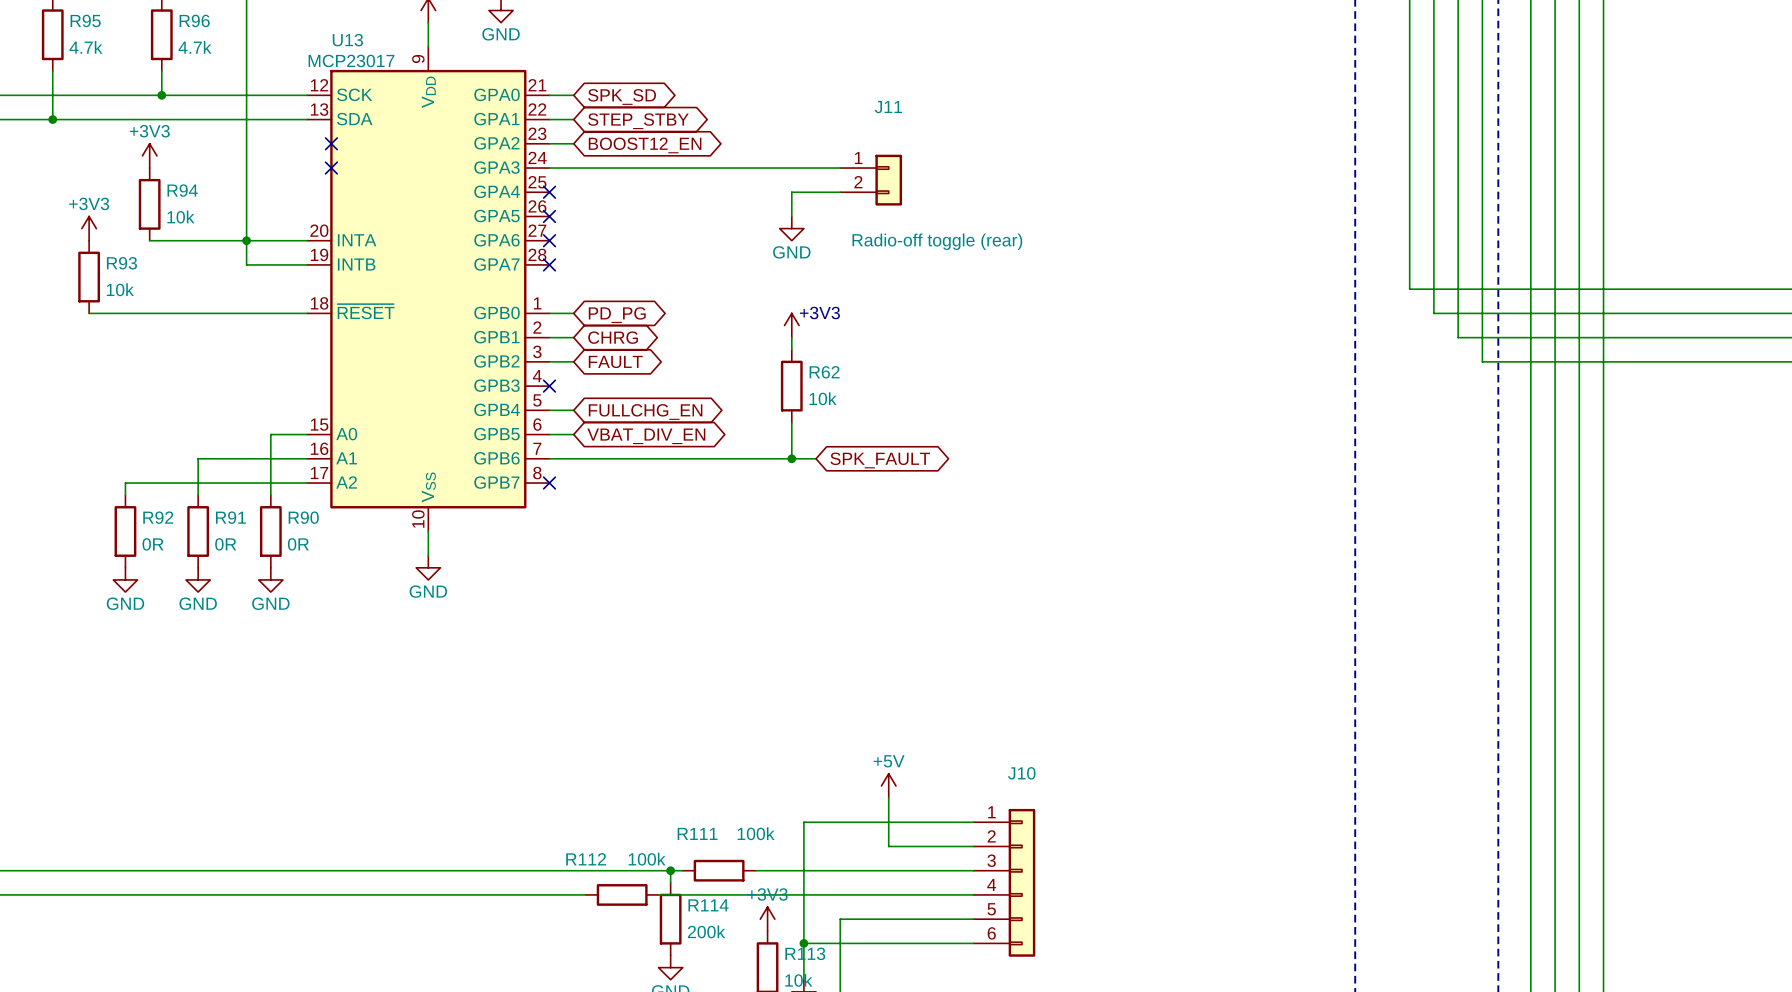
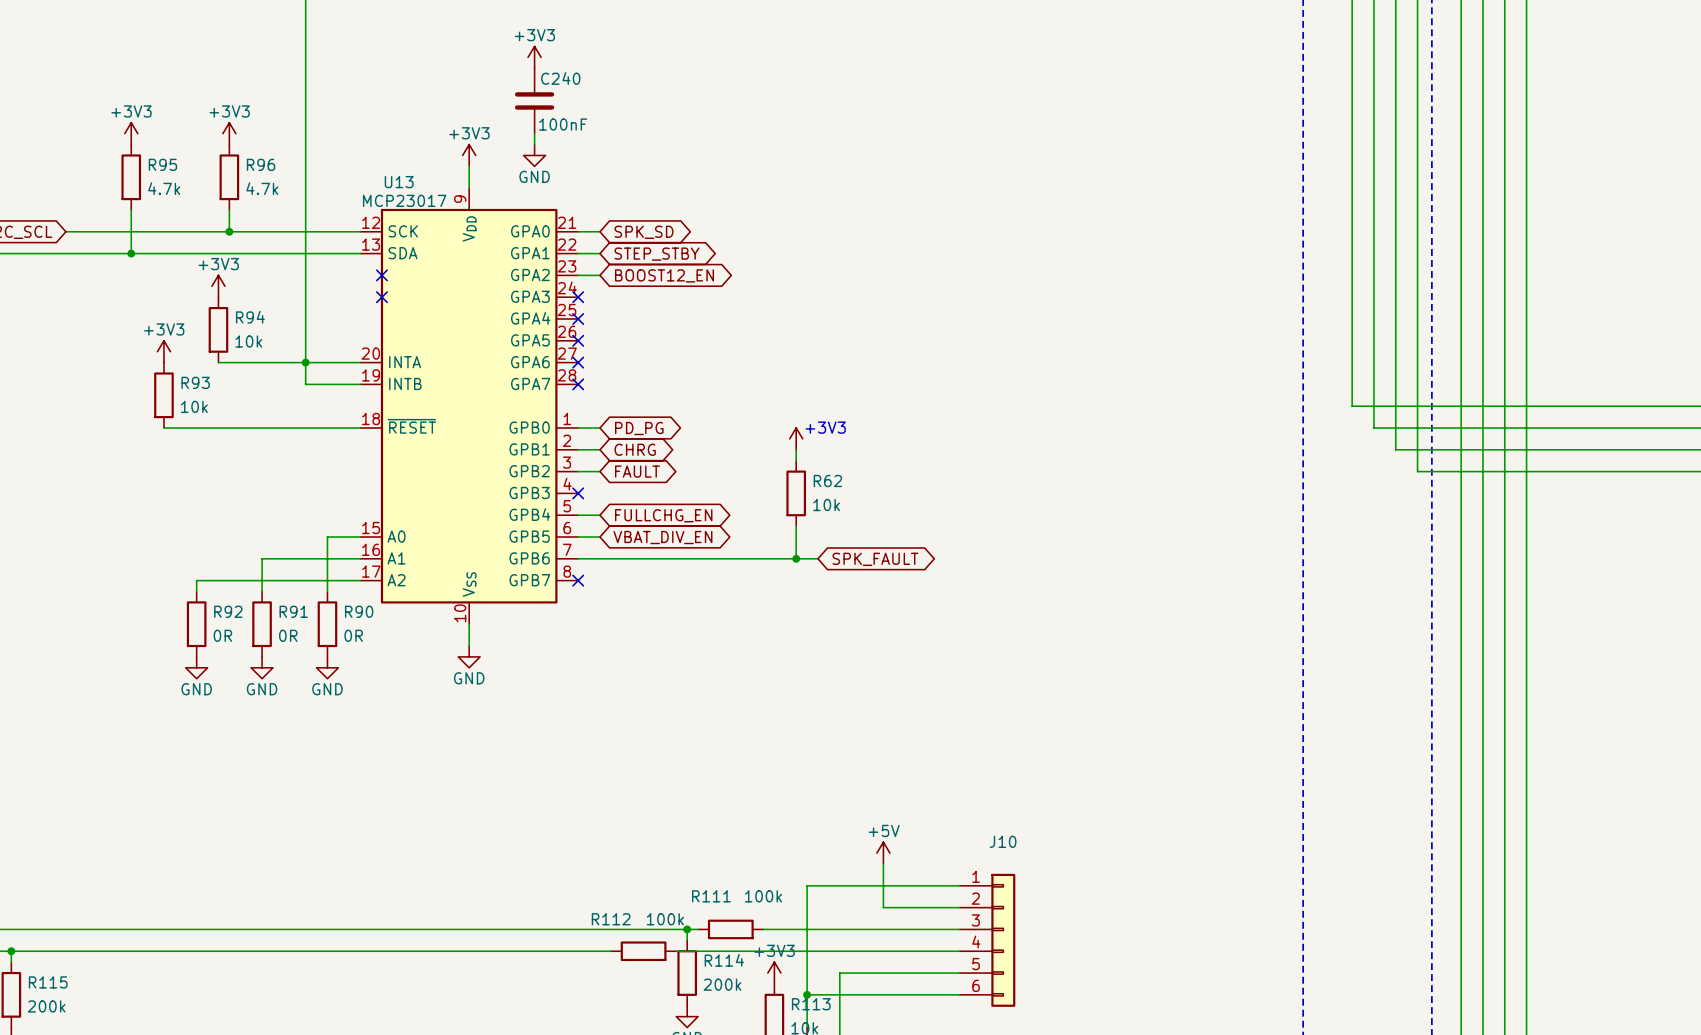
wire: (549, 168) (840, 168) -> none
no-connect mark: none -> (578, 297)
J11: Radio-off toggle (rear) (871, 180) -> none
wire: (840, 192) (791, 192) (791, 216) -> none
power symbol: GND (791, 228) -> none

